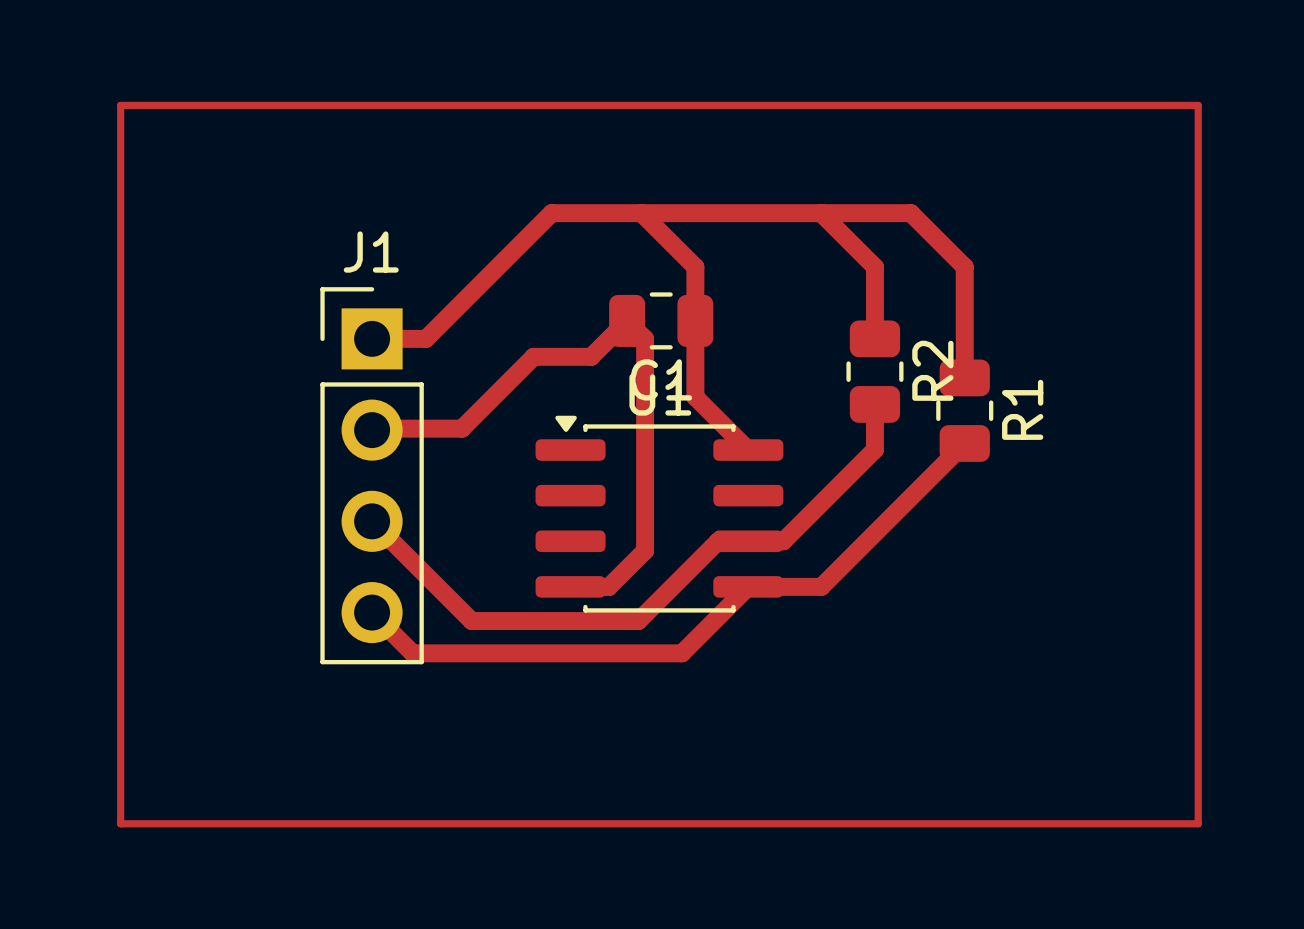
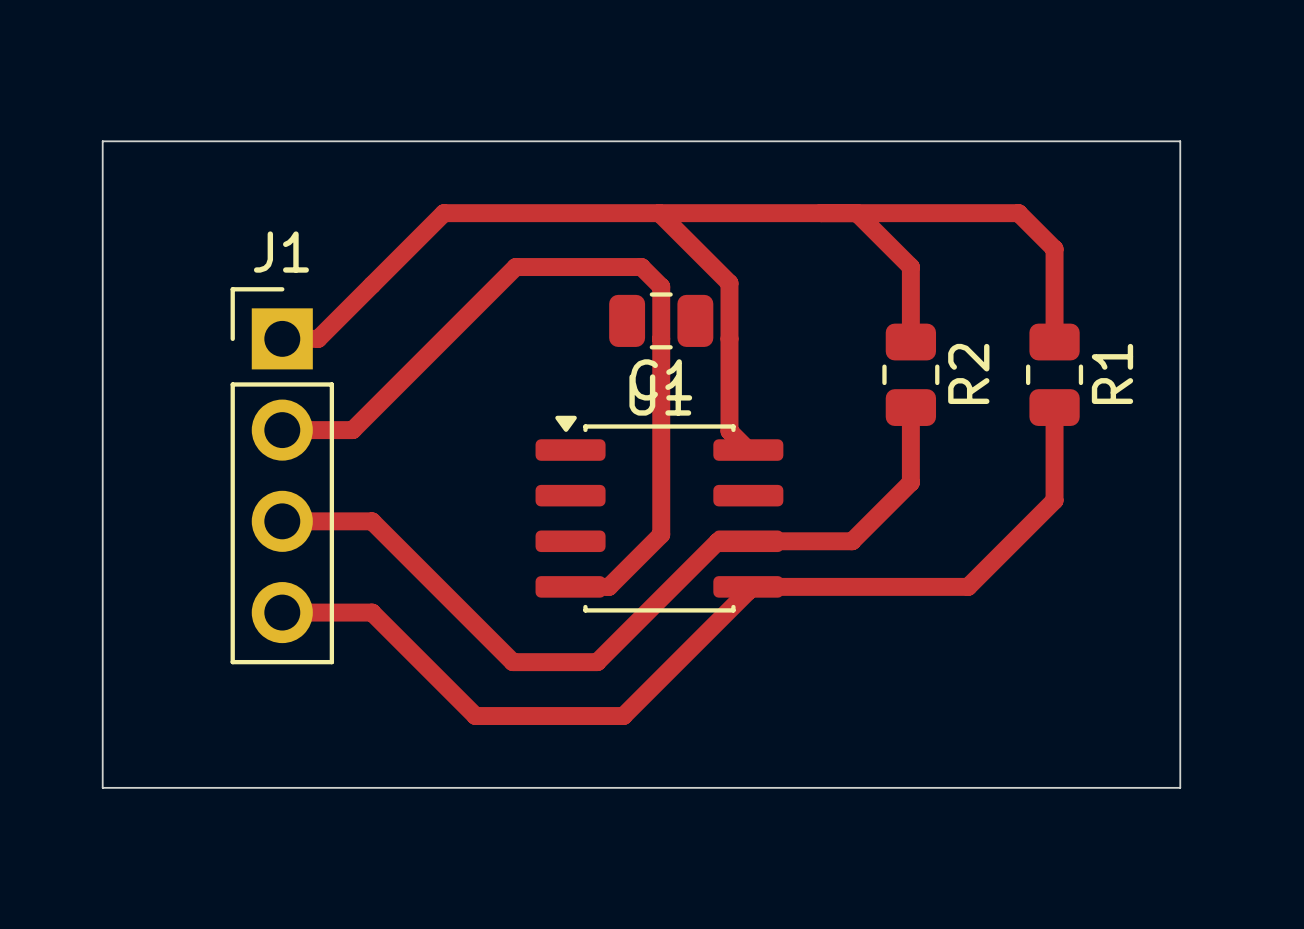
track: (120, 105) (1198, 105) (1198, 823) (120, 823) (120, 105) -> none
board edge: none -> (102, 141) (1180, 141) (1180, 787) (102, 787) (102, 141)
track: (551, 213) (425, 338) (372, 338) -> (551, 213) (443, 213) (318, 338) (282, 338)
track: (641, 213) (695, 267) (695, 397) (729, 431) -> (659, 213) (729, 283) (729, 431)
track: (821, 213) (874, 267) (874, 338) -> none
track: none -> (857, 213) (910, 267) (910, 342)
track: (910, 213) (964, 267) (964, 377) -> (910, 213) (1018, 213) (1054, 249) (1054, 342)
R2 position: (874, 371) -> (910, 374)
track: (874, 404) (874, 449) (783, 541) -> (910, 407) (910, 482) (852, 541) (783, 541)
R1 position: (964, 410) -> (1054, 374)
track: (372, 430) (461, 428) (533, 356) (591, 356) (627, 320) (645, 338) (645, 550) -> (282, 430) (352, 430) (515, 267) (641, 267) (661, 286) (661, 534) (645, 550)
track: (964, 443) (821, 586) -> (1054, 407) (1054, 500) (968, 586) (821, 586)
J1 position: (372, 475) -> (282, 475)
track: none -> (282, 521) (372, 521)
track: (748, 586) (681, 653) (412, 653) -> (748, 586) (748, 591) (623, 716) (475, 716) (412, 653)
track: none -> (282, 612) (372, 612)
track: (471, 621) (638, 621) -> (471, 621) (512, 662) (597, 662) (638, 621)

